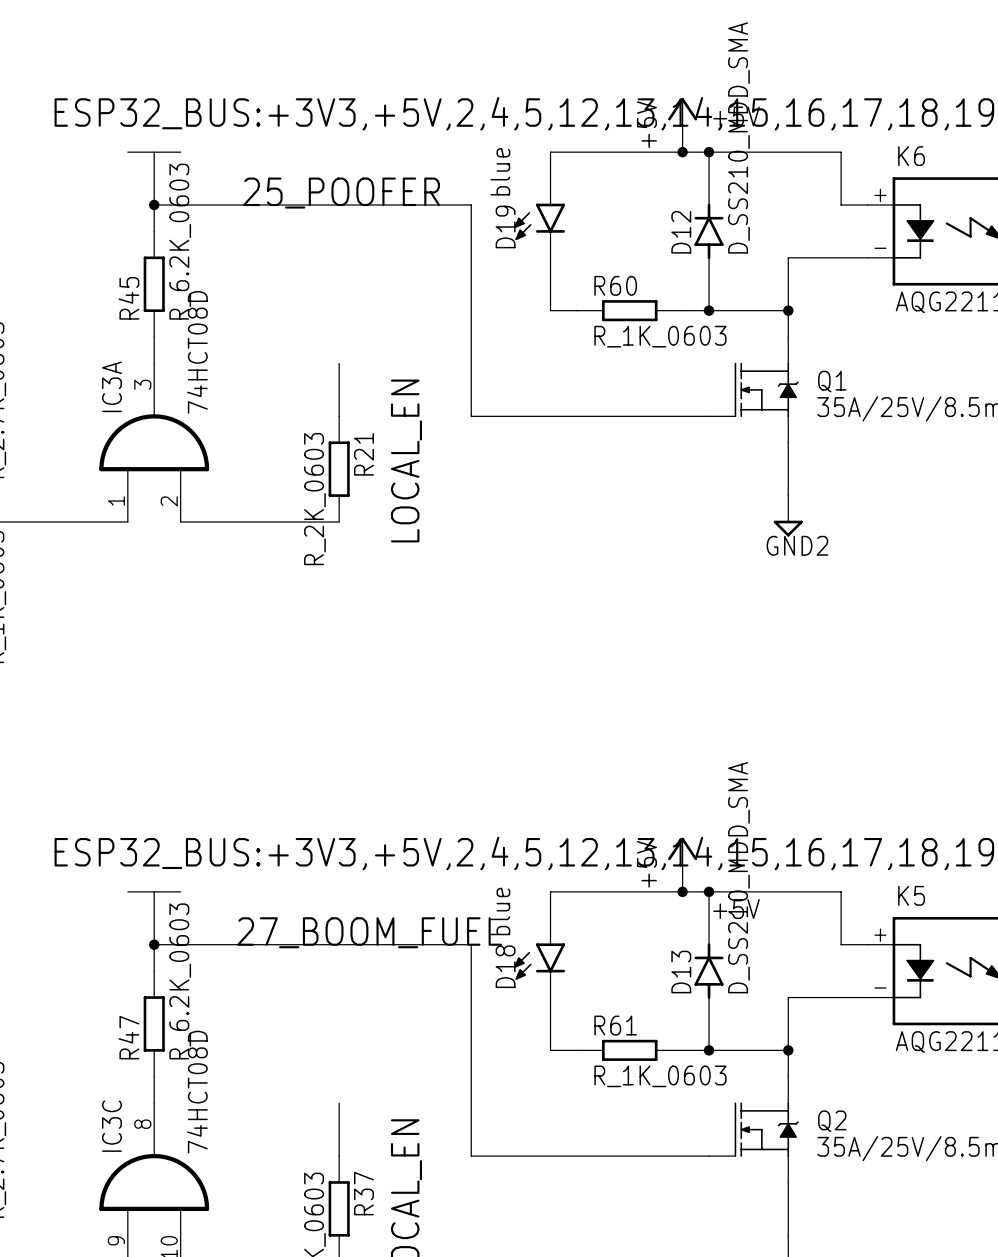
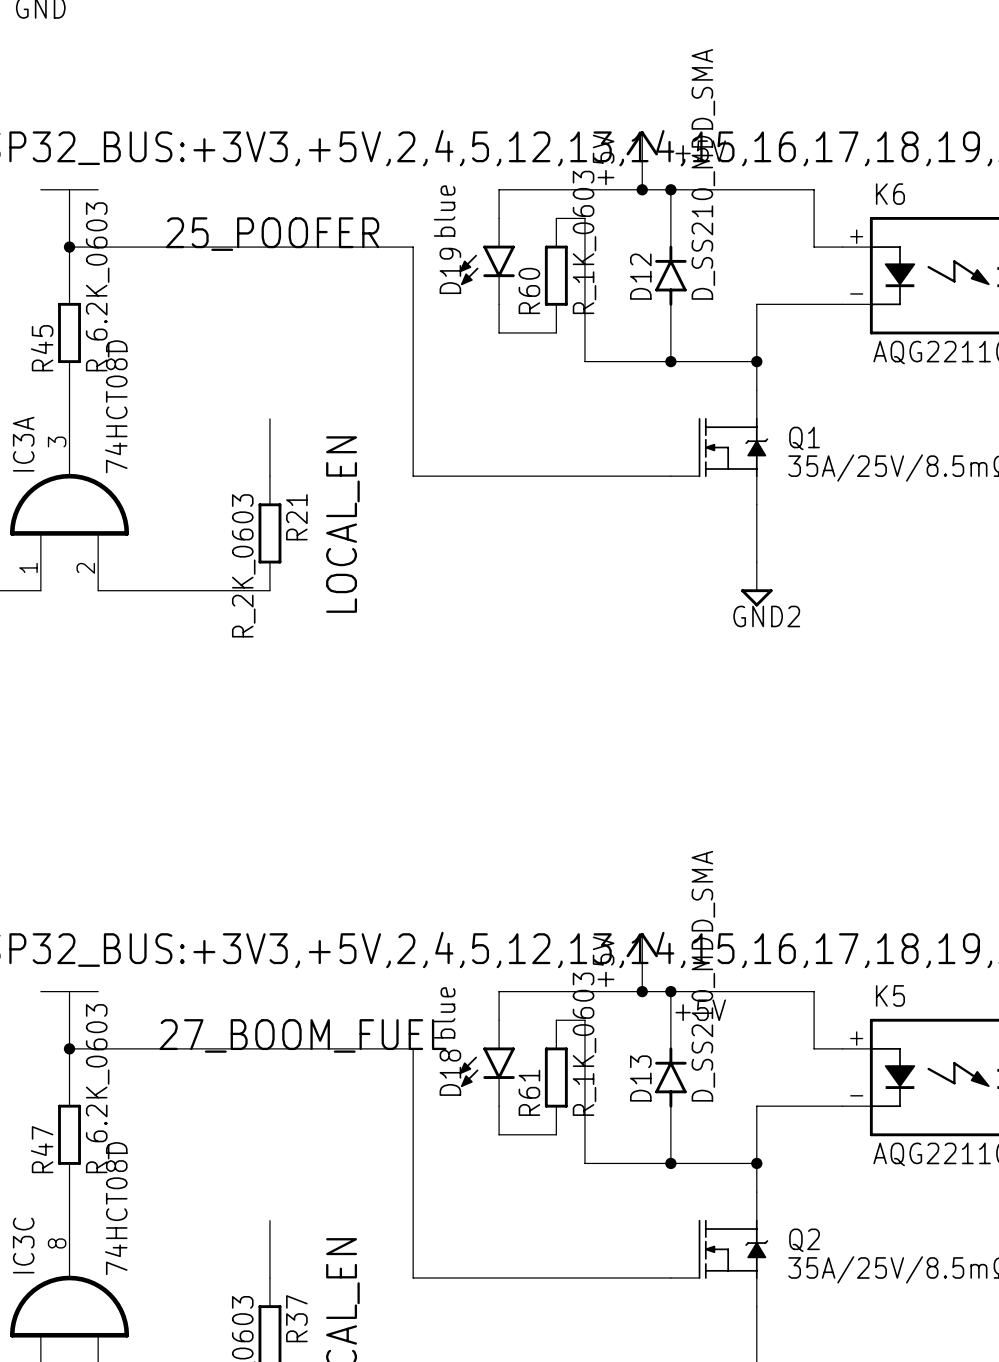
wire: none -> (556, 218) (584, 218) (584, 361) (642, 361)
wire: (550, 284) (550, 310) (576, 310) -> (499, 332) (556, 332)
R60 name position: R60 (615, 285) -> R60 (529, 290)
R60 rotation: 0° (629, 310) -> 90° clockwise (556, 275)
R60 position: (629, 310) -> (556, 275)
R60 value position: R_1K_0603 (660, 336) -> R_1K_0603 (584, 242)
wire: none -> (556, 1020) (584, 1020) (584, 1163) (642, 1163)
wire: (550, 1023) (550, 1050) (576, 1050) -> (499, 1134) (556, 1134)
R61 name position: R61 (615, 1025) -> R61 (529, 1092)
R61 rotation: 0° (629, 1050) -> 90° clockwise (556, 1077)
R61 position: (629, 1050) -> (556, 1077)
R61 value position: R_1K_0603 (660, 1076) -> R_1K_0603 (584, 1044)

